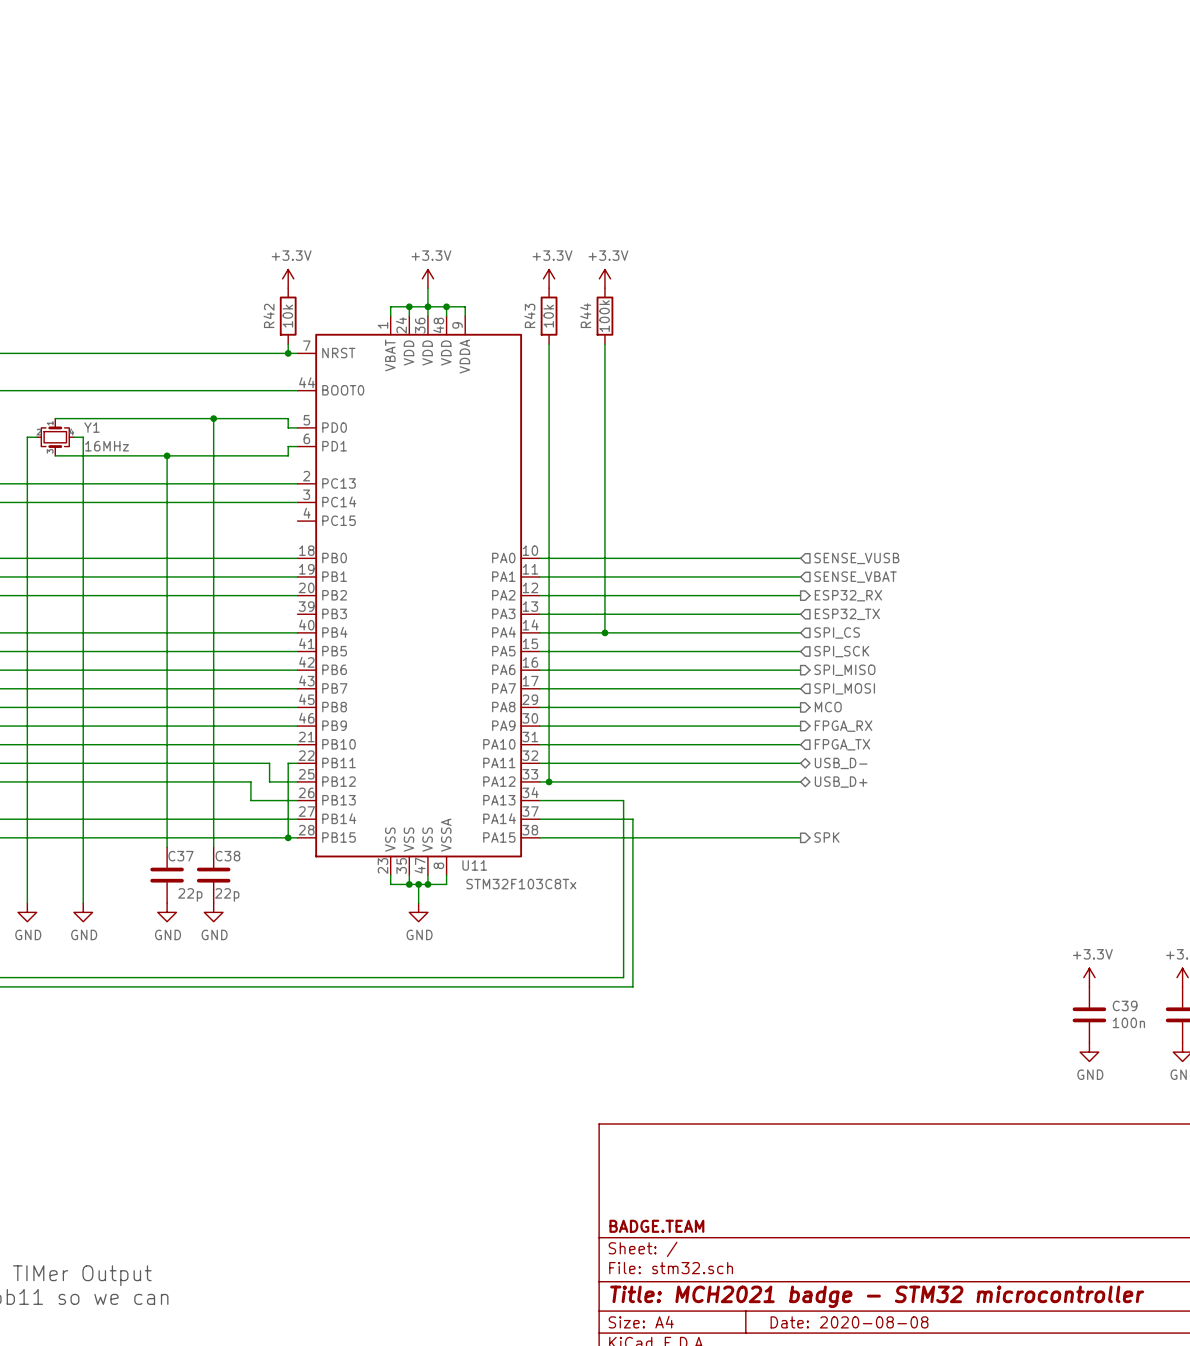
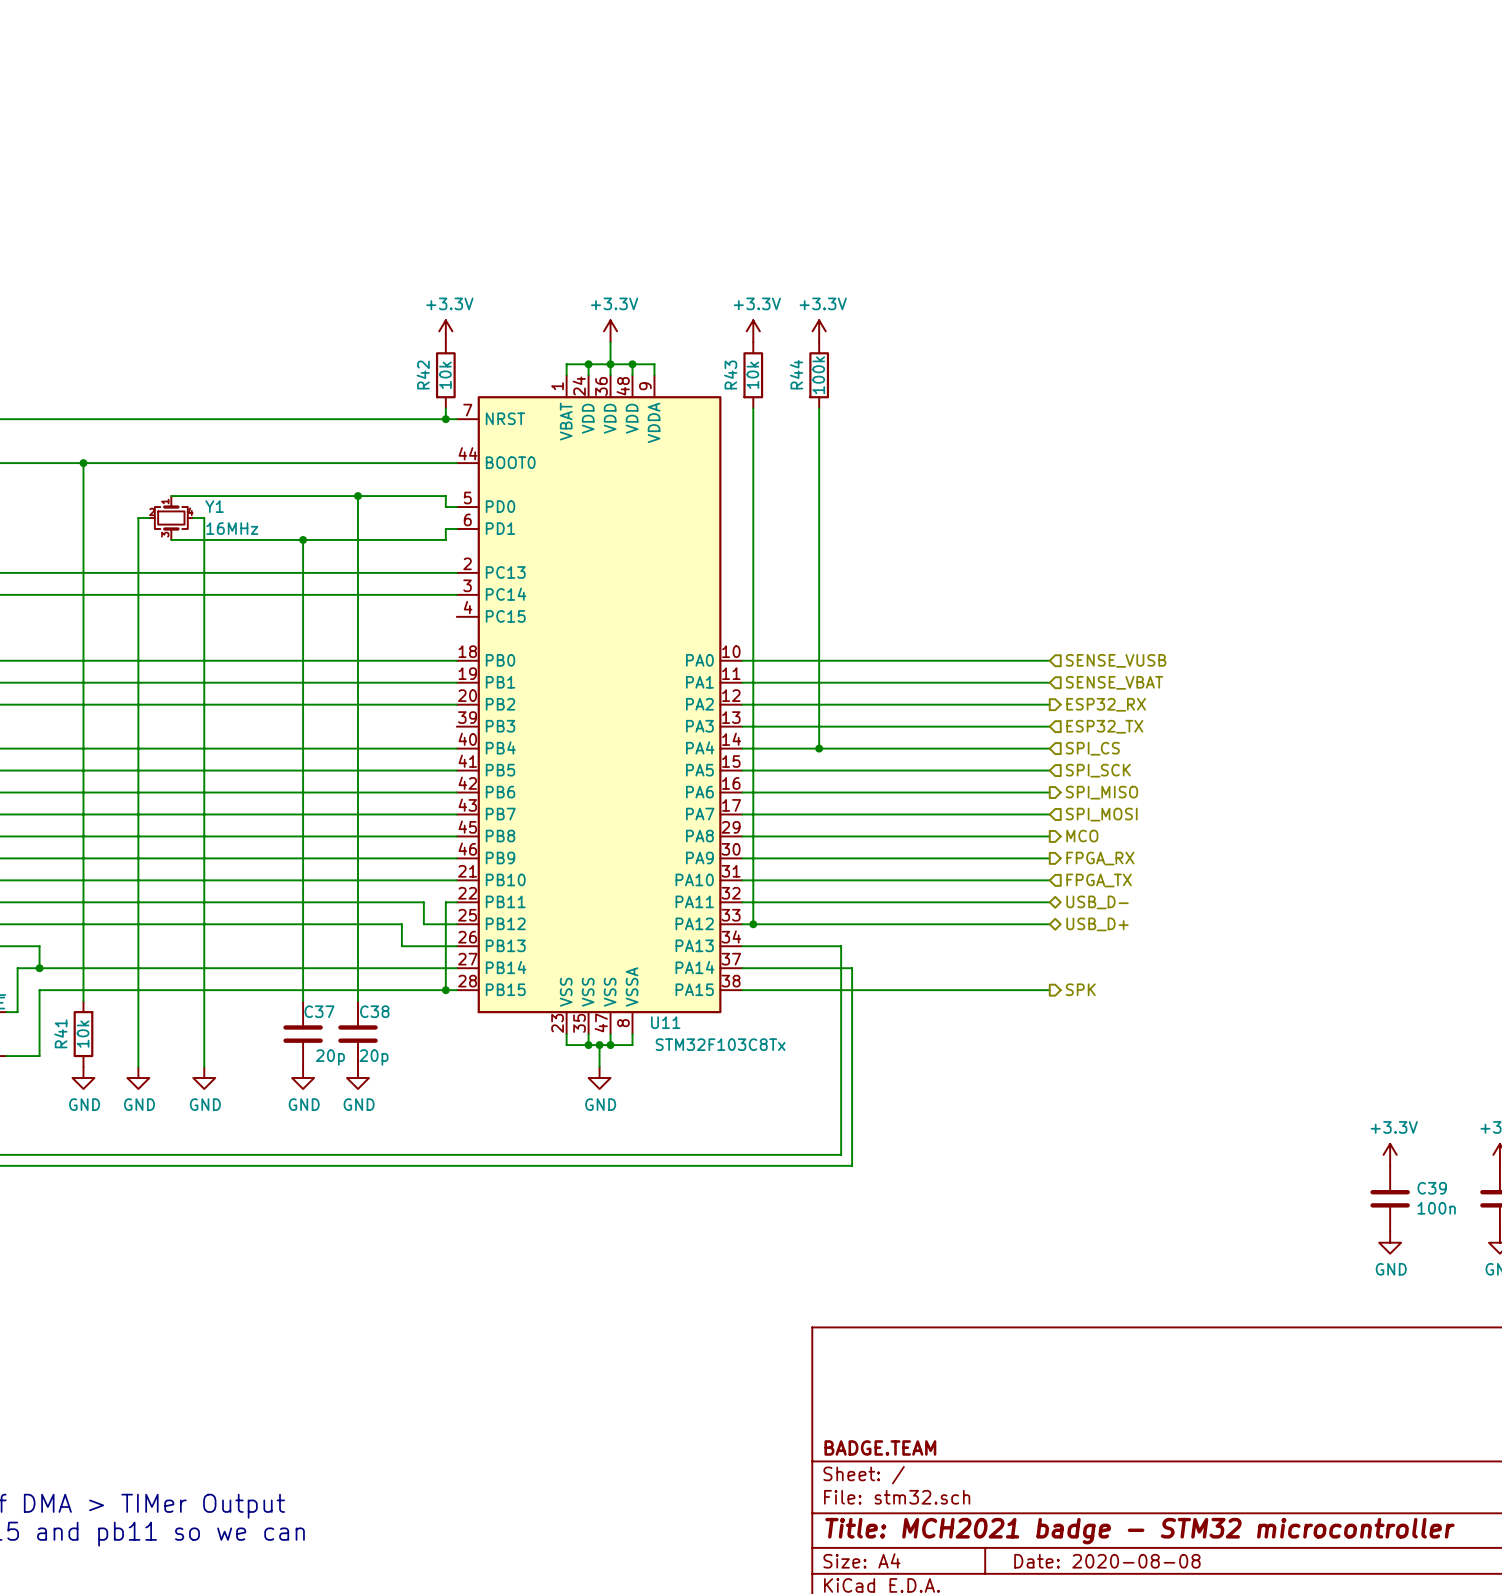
C37 value: 22p (190, 894) -> 20p (330, 1057)
C38 value: 22p (227, 894) -> 20p (374, 1057)

